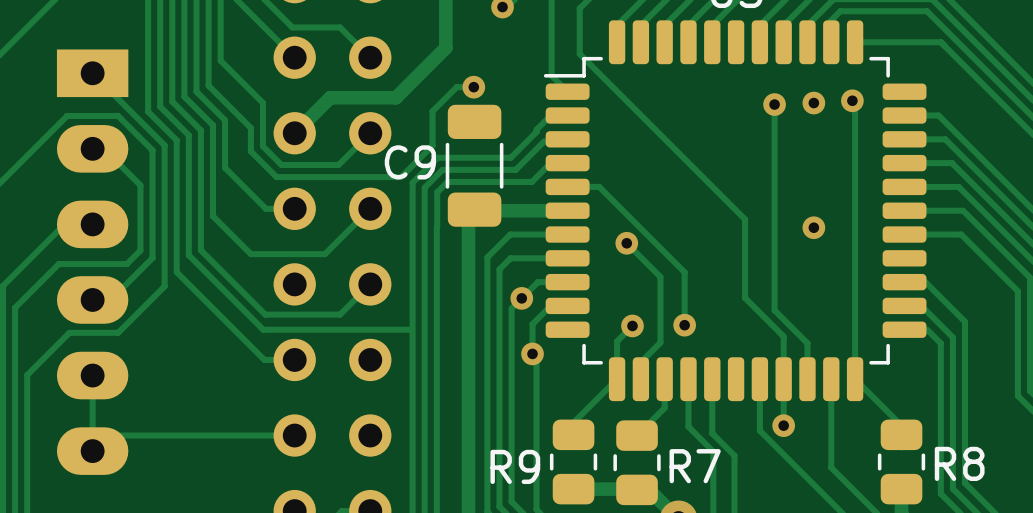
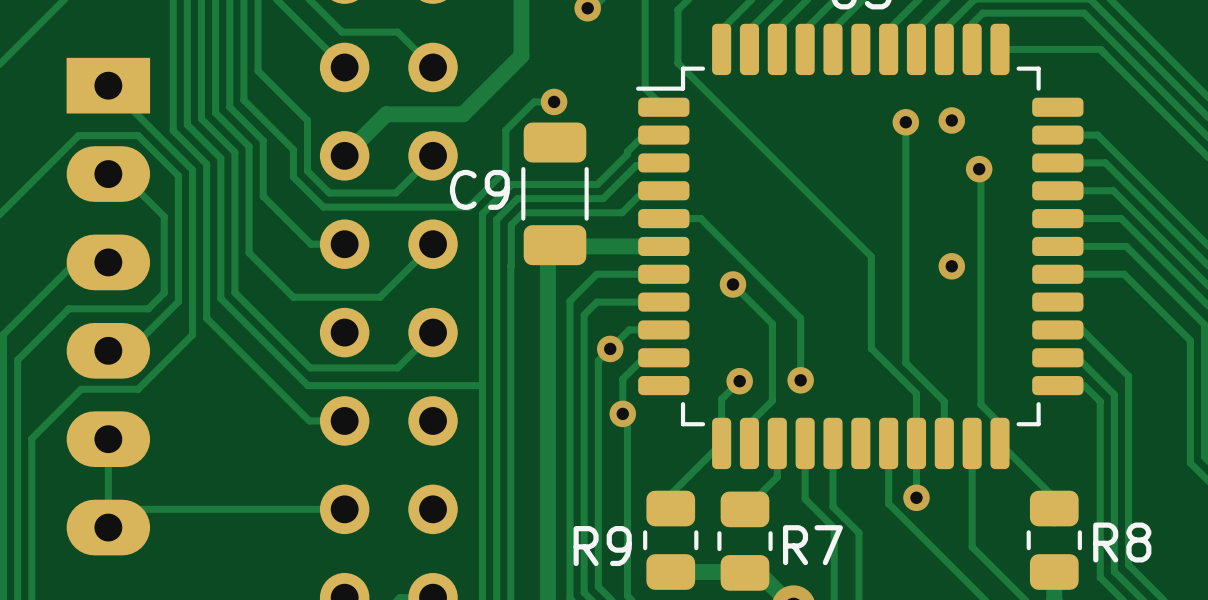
track: (852, 100) (855, 103) (855, 362) -> (979, 169) (980, 170) (980, 404) (999, 423)
via position: (852, 100) -> (979, 169)

